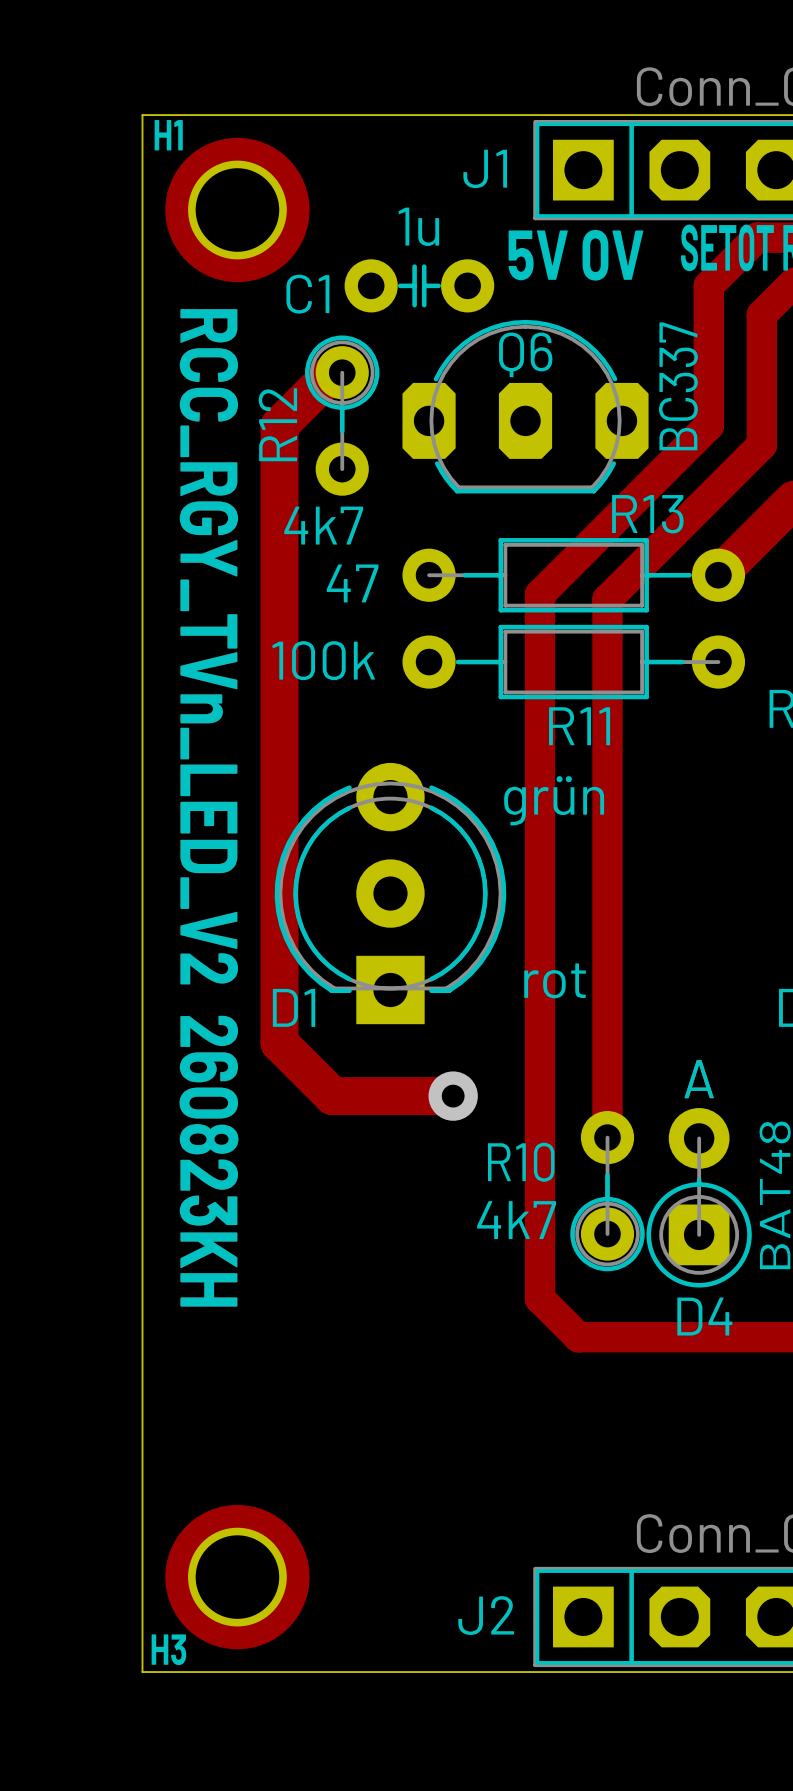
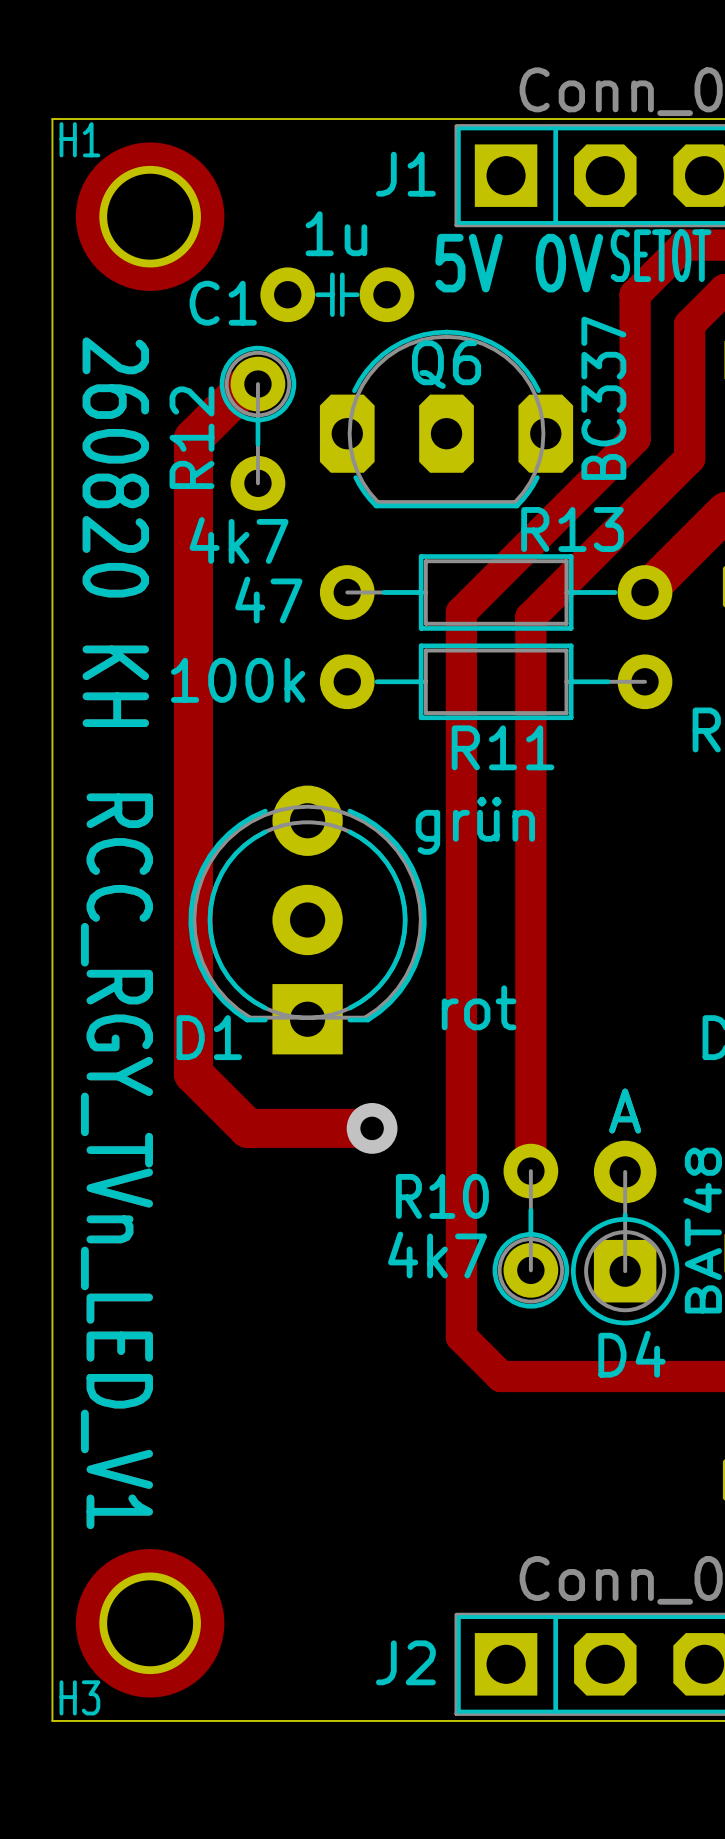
text: none -> 260820 KH (115, 532)
text: RCC_RGY_TVn_LED_V2 260823KH (208, 807) -> none
text: none -> RCC_RGY_TVn_LED_V1 (116, 1161)

